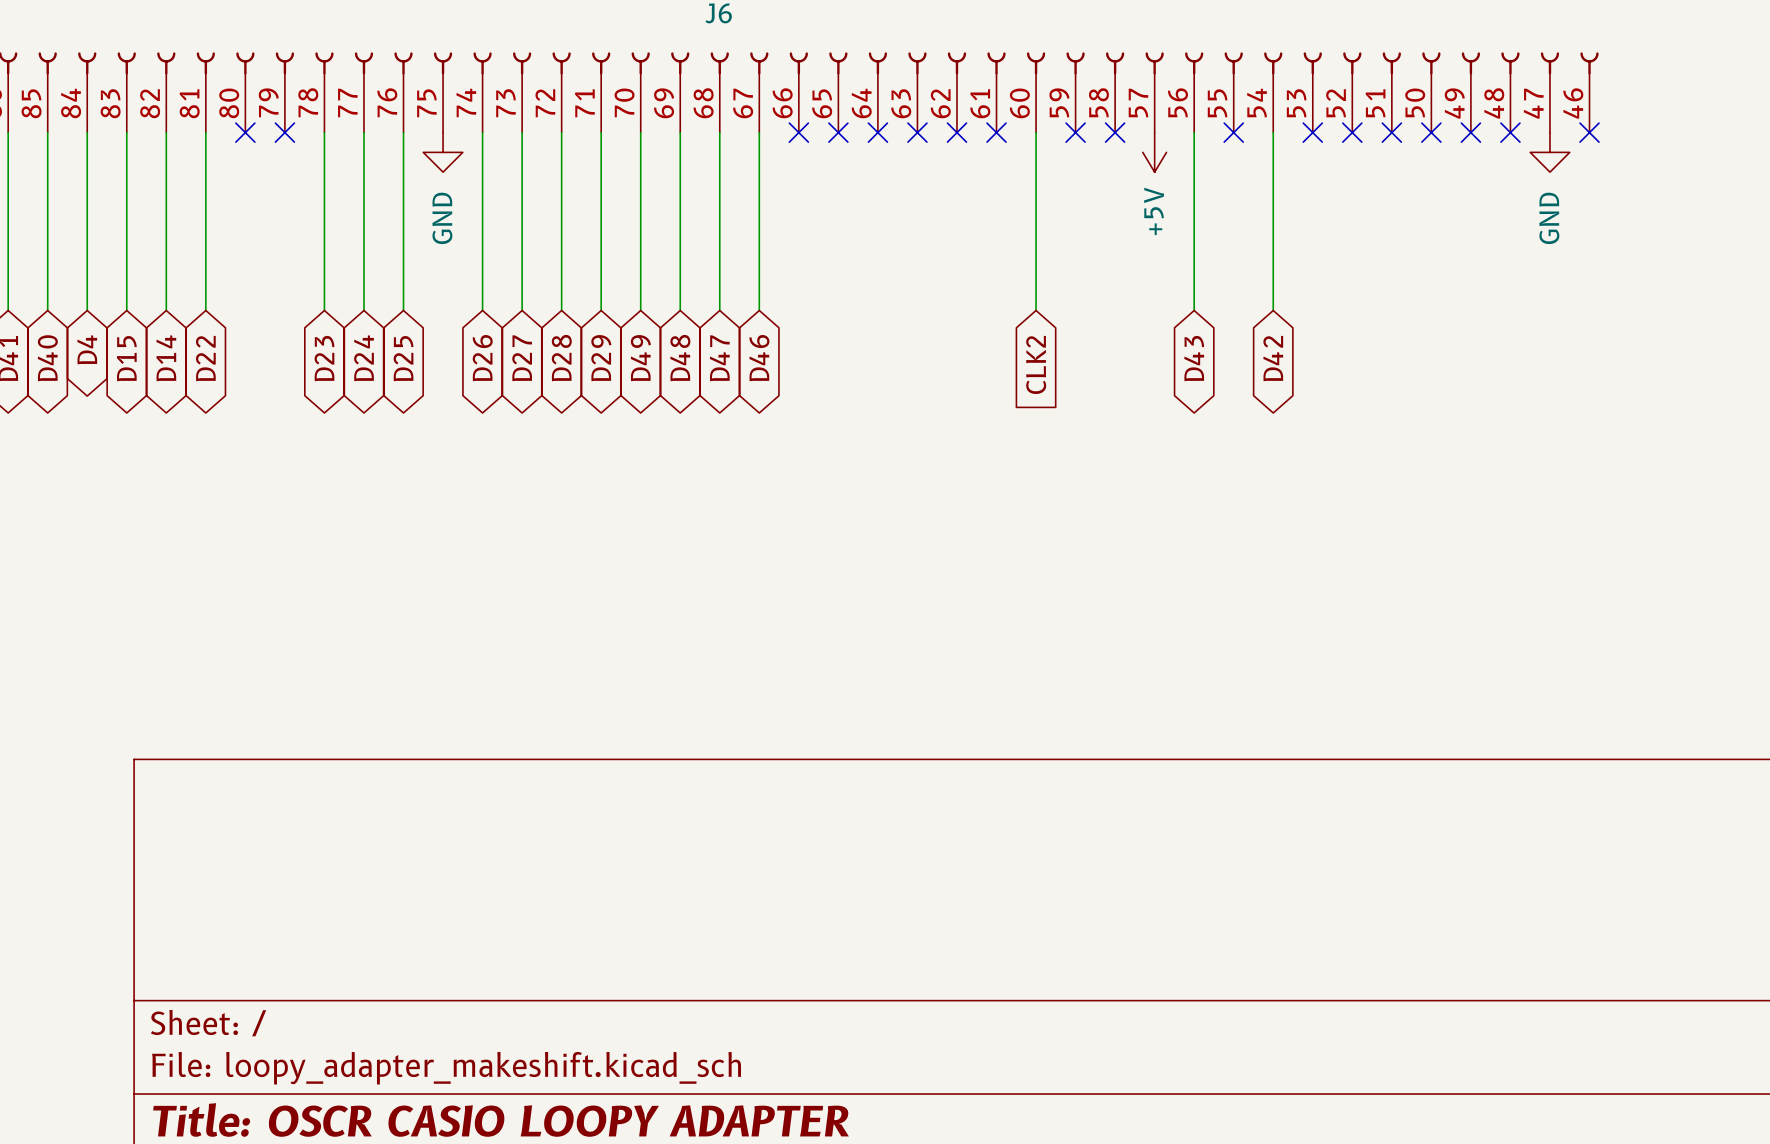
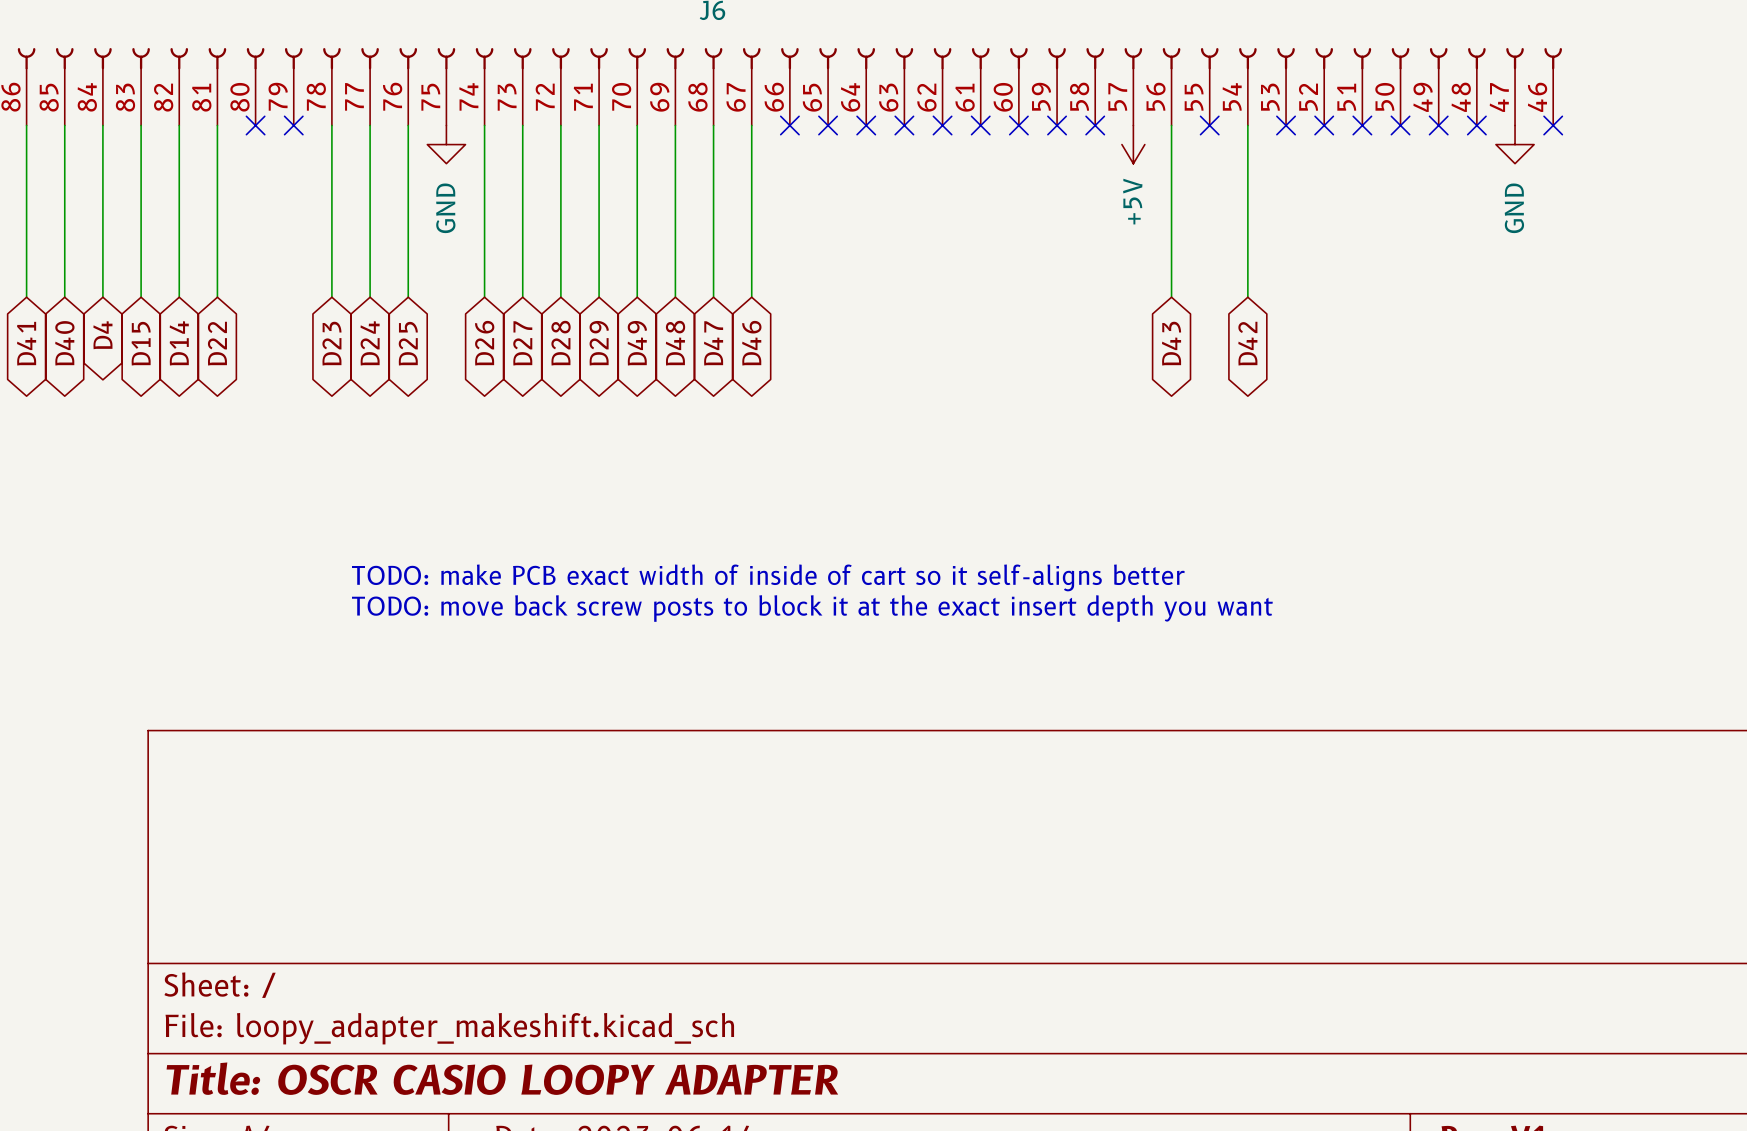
wire: (1036, 132) (1036, 310) -> none
no-connect mark: none -> (1018, 125)
global label: CLK2 (1036, 364) -> none
text: none -> TODO: make PCB exact width of inside of cart so it self-aligns better (768, 577)
text: none -> TODO: move back screw posts to block it at the exact insert depth you want (812, 608)

